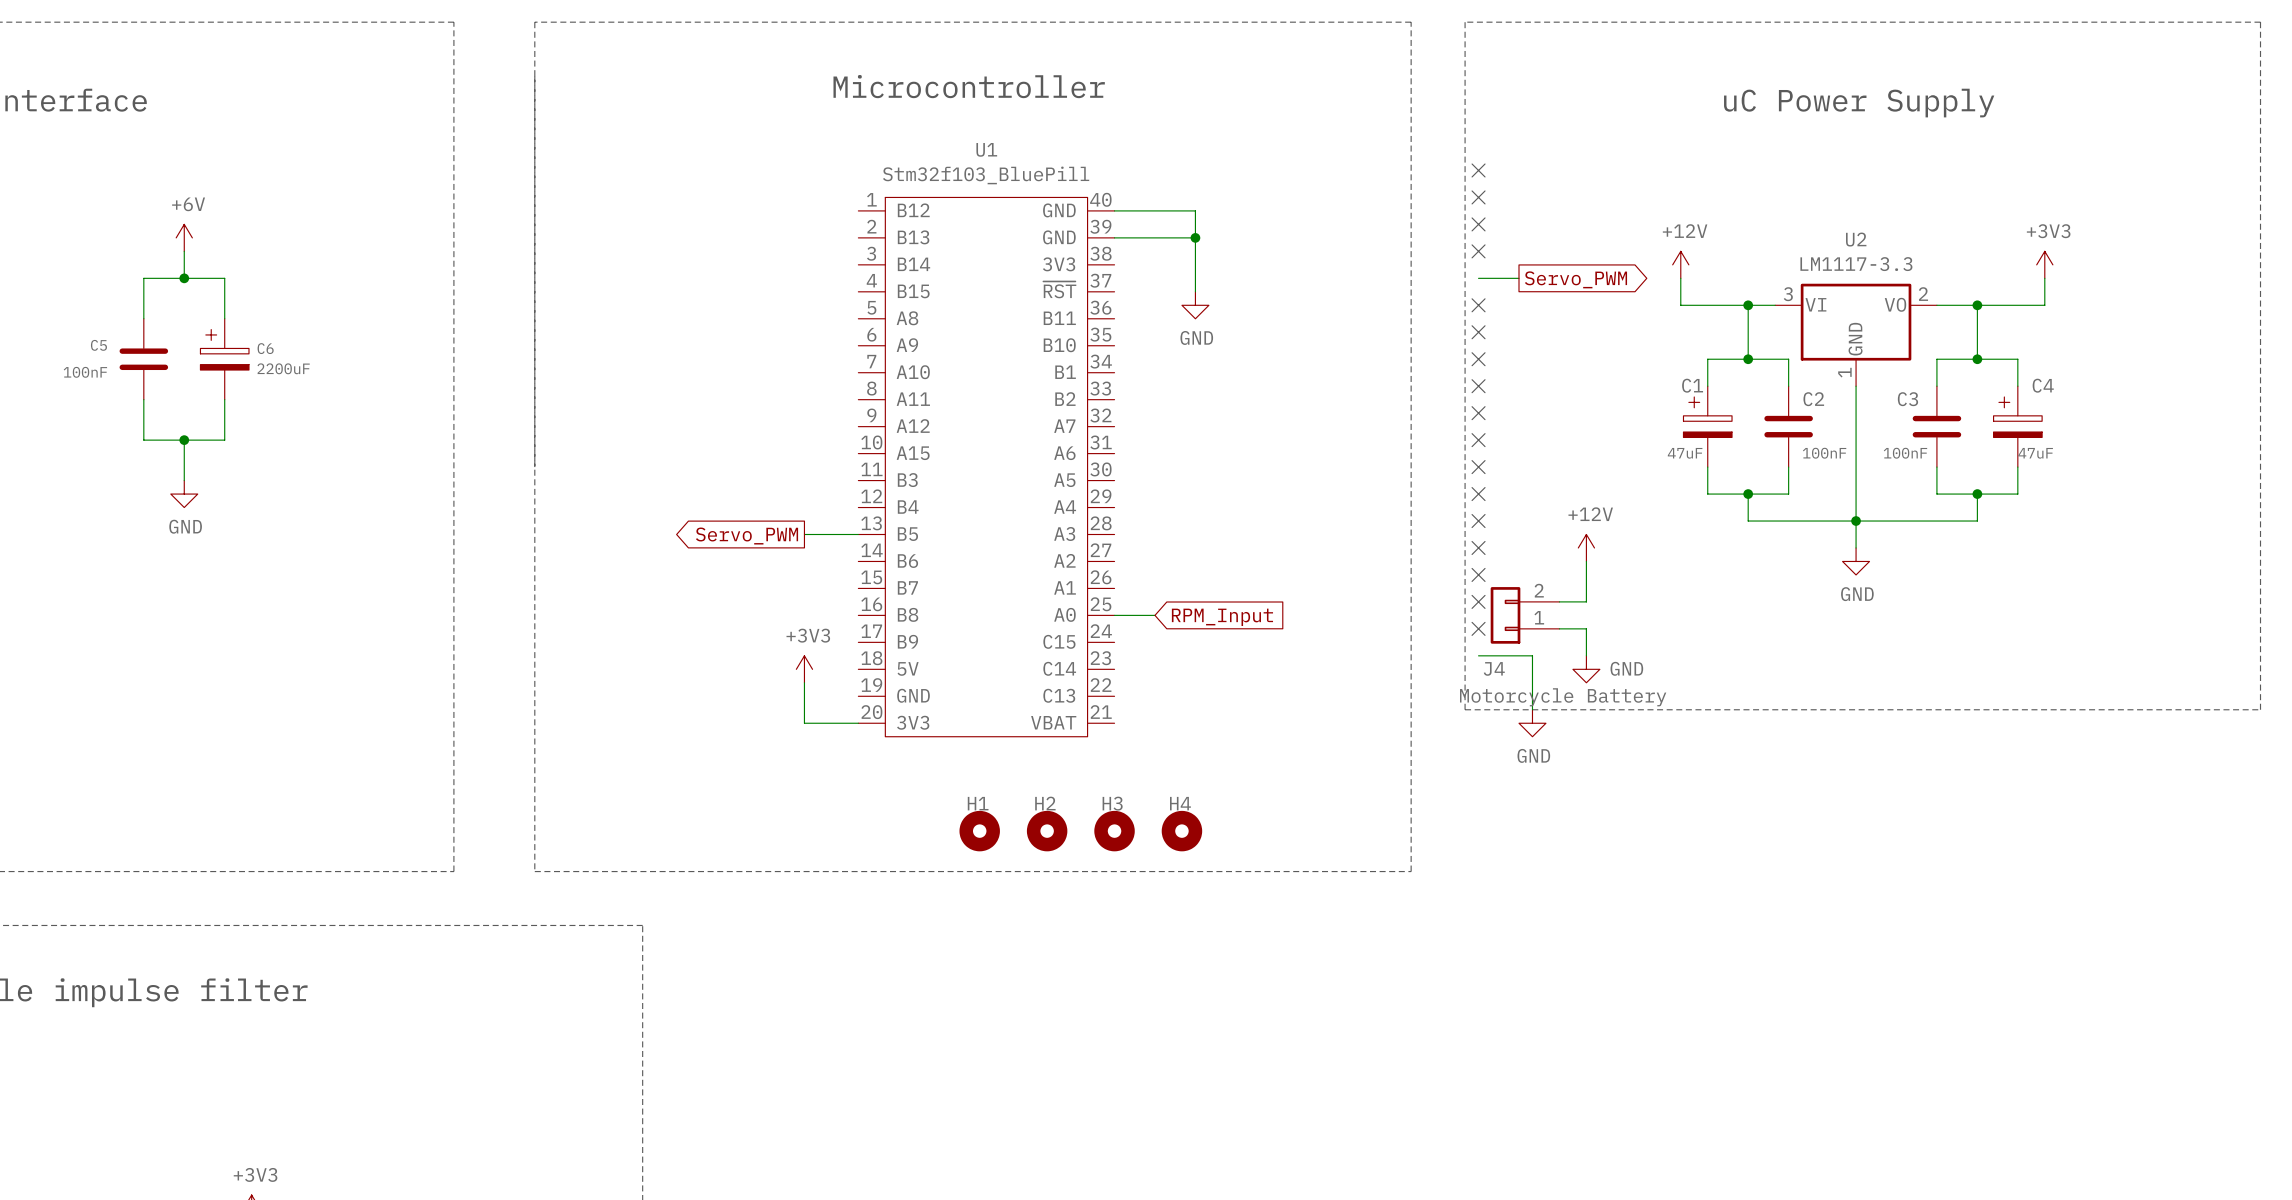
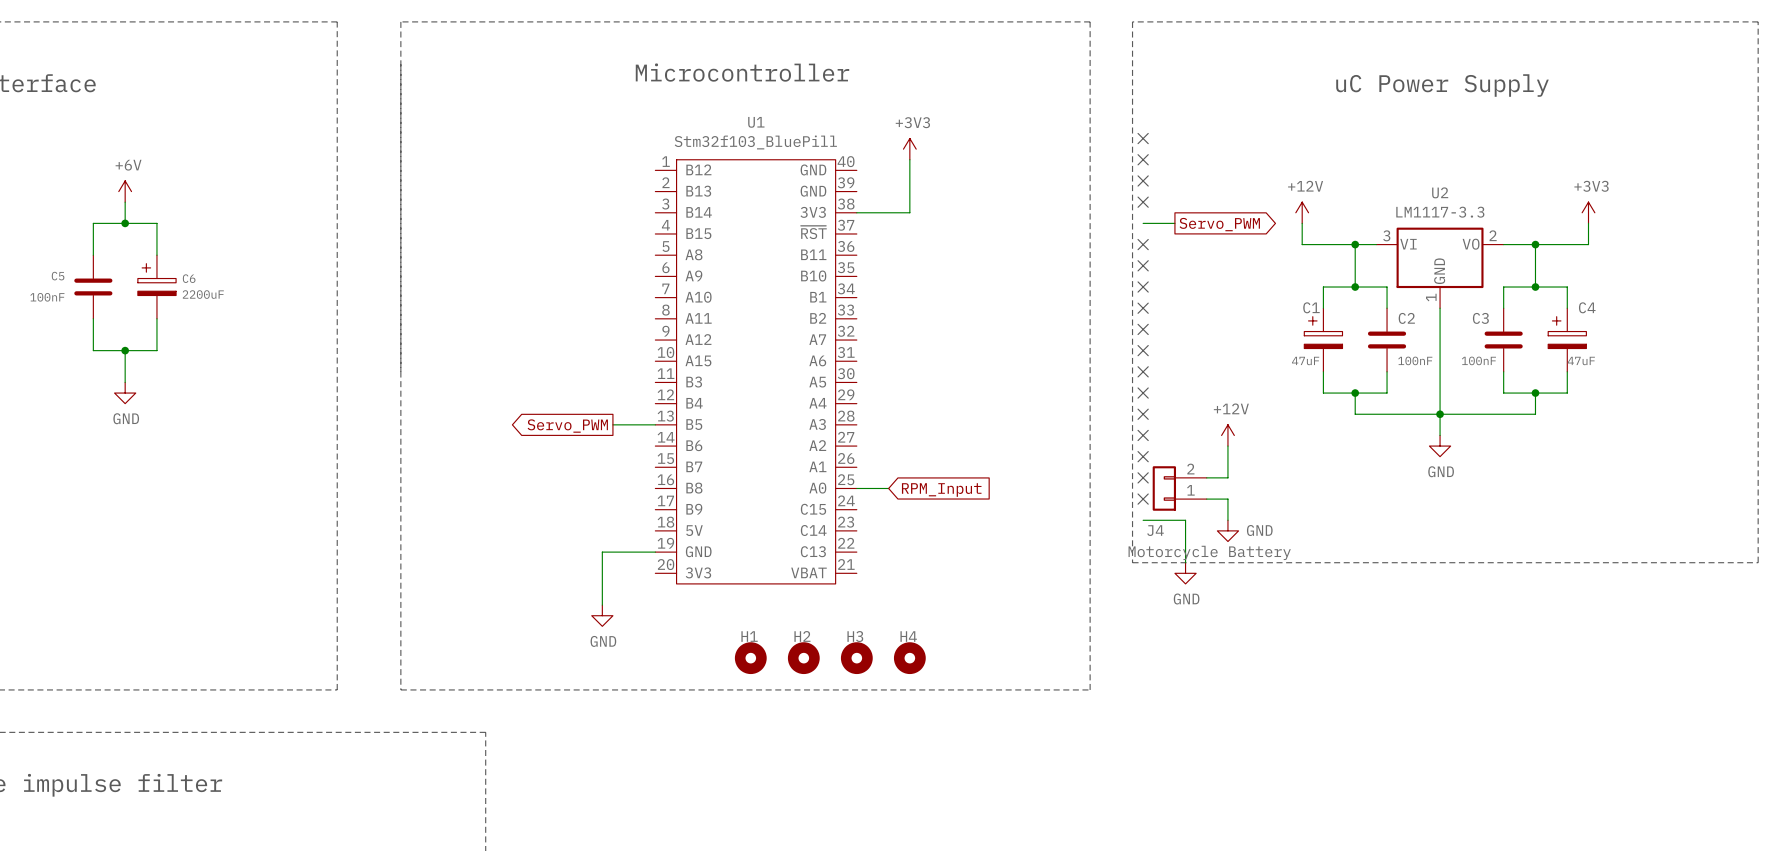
power symbol: none -> +3V3 (909, 149)
wire: none -> (909, 159) (909, 212) (856, 212)
wire: (1114, 210) (1195, 210) (1195, 291) -> none
wire: (1114, 237) (1195, 237) -> none
junction: (1195, 237) -> none
power symbol: GND (1195, 305) -> none
power symbol: +3V3 (804, 669) -> none
wire: (804, 682) (804, 723) (858, 723) -> none
wire: none -> (655, 552) (602, 552) (602, 605)
power symbol: none -> GND (602, 615)

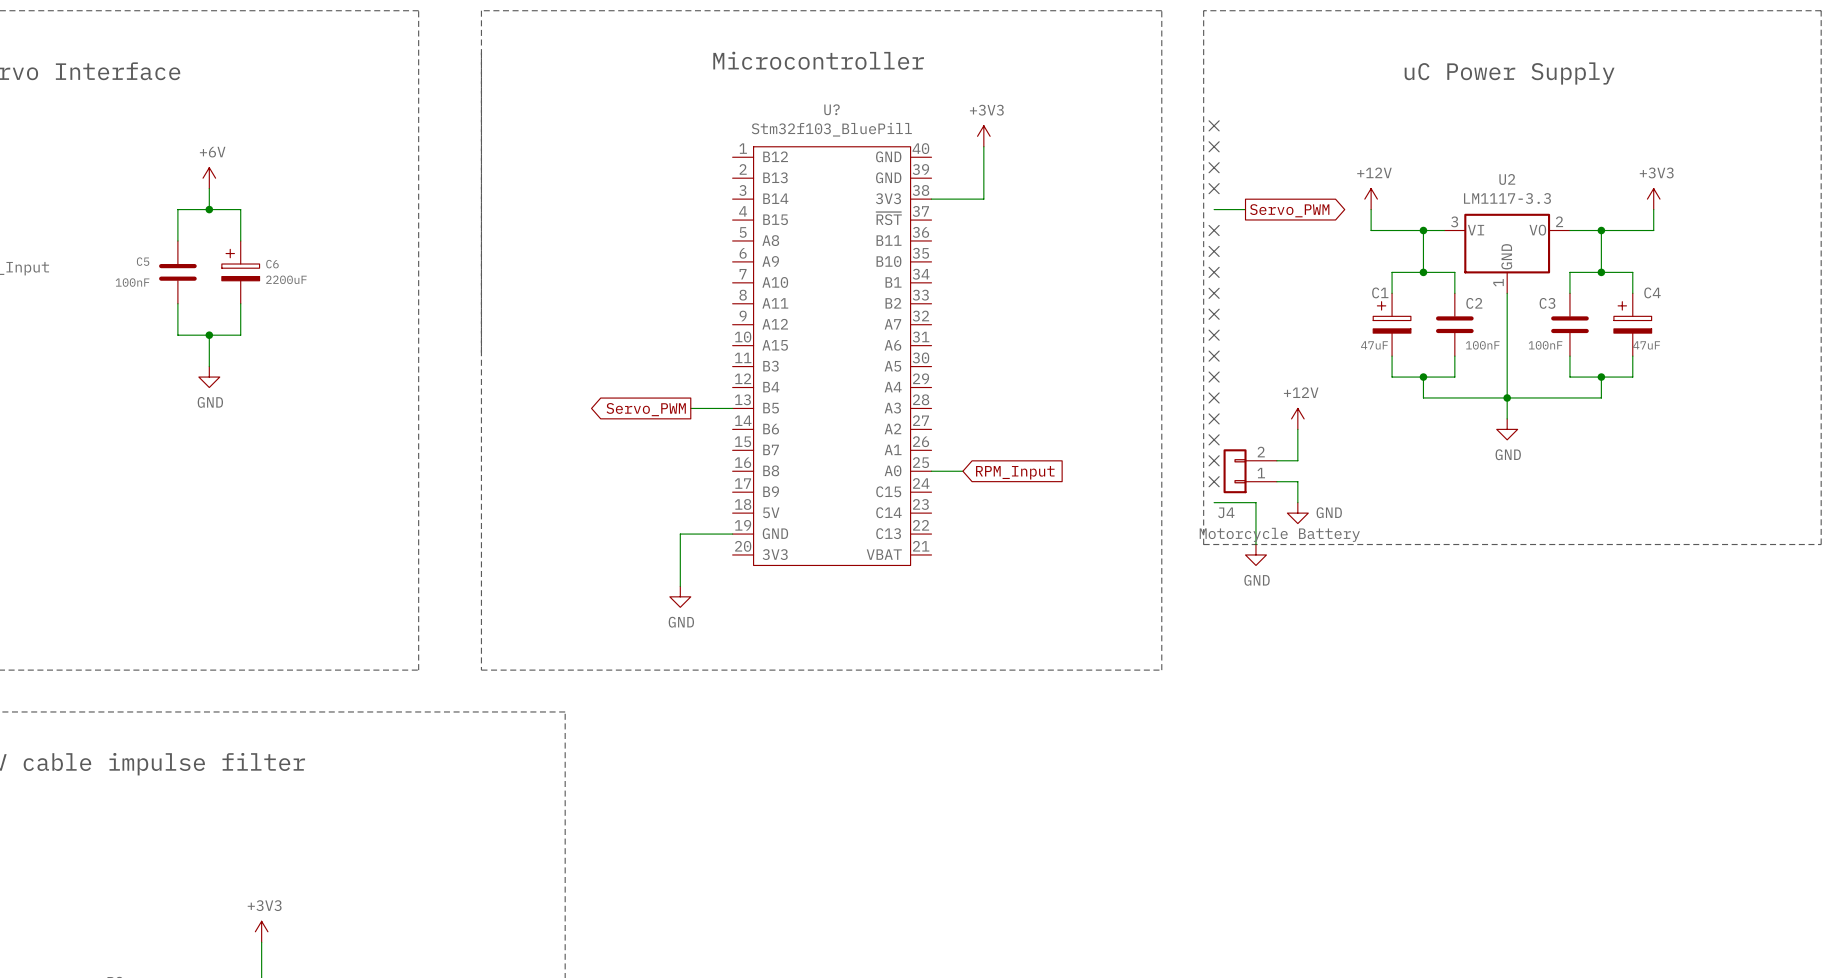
U1 name: U1 (756, 122) -> U? (832, 109)
H1: (750, 658) -> none
H2: (803, 658) -> none
H3: (856, 658) -> none
H4: (909, 658) -> none

